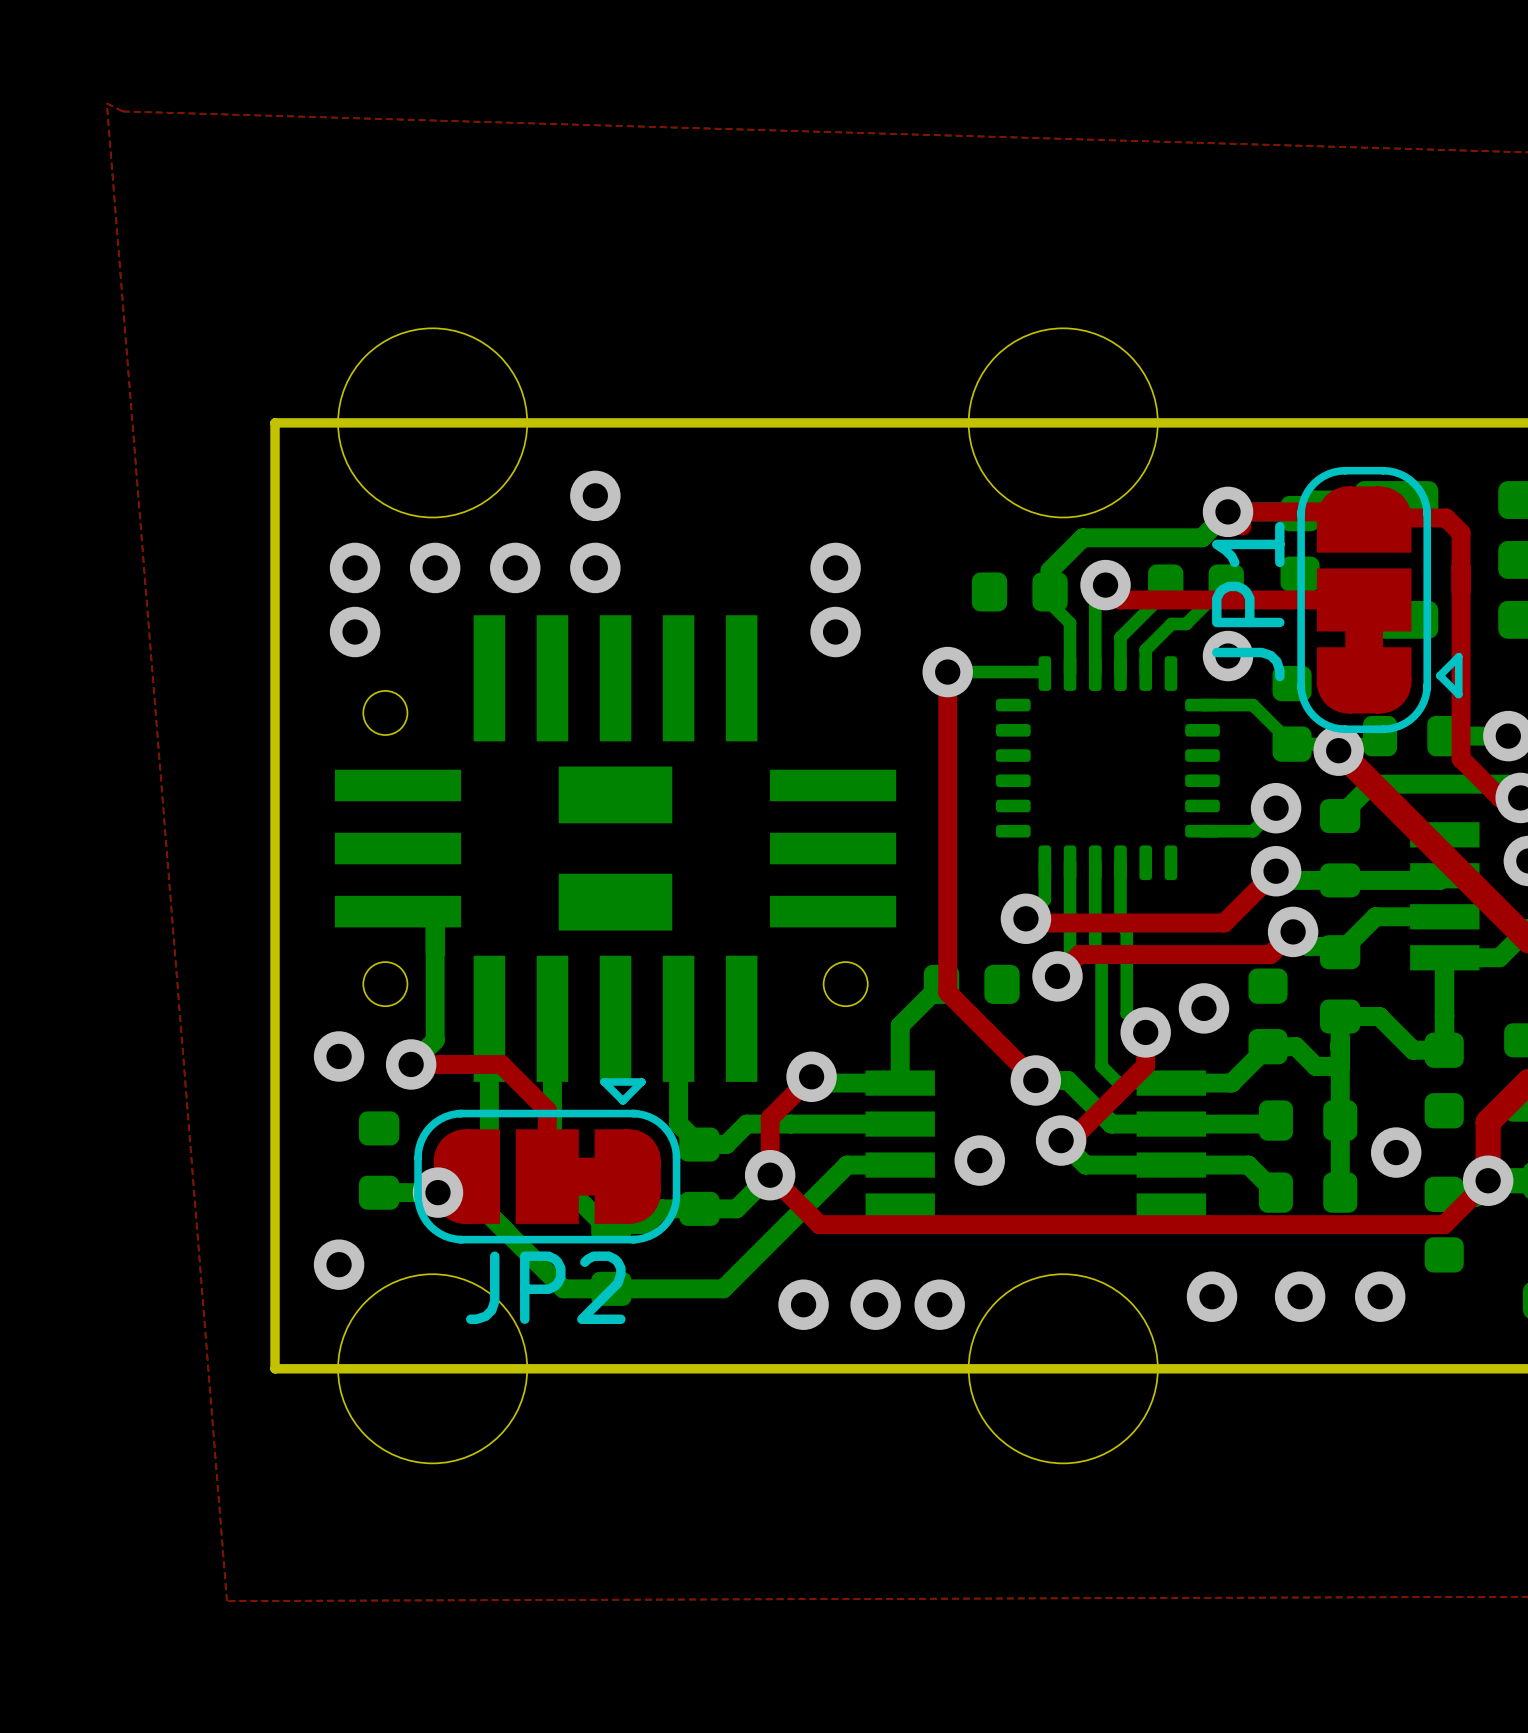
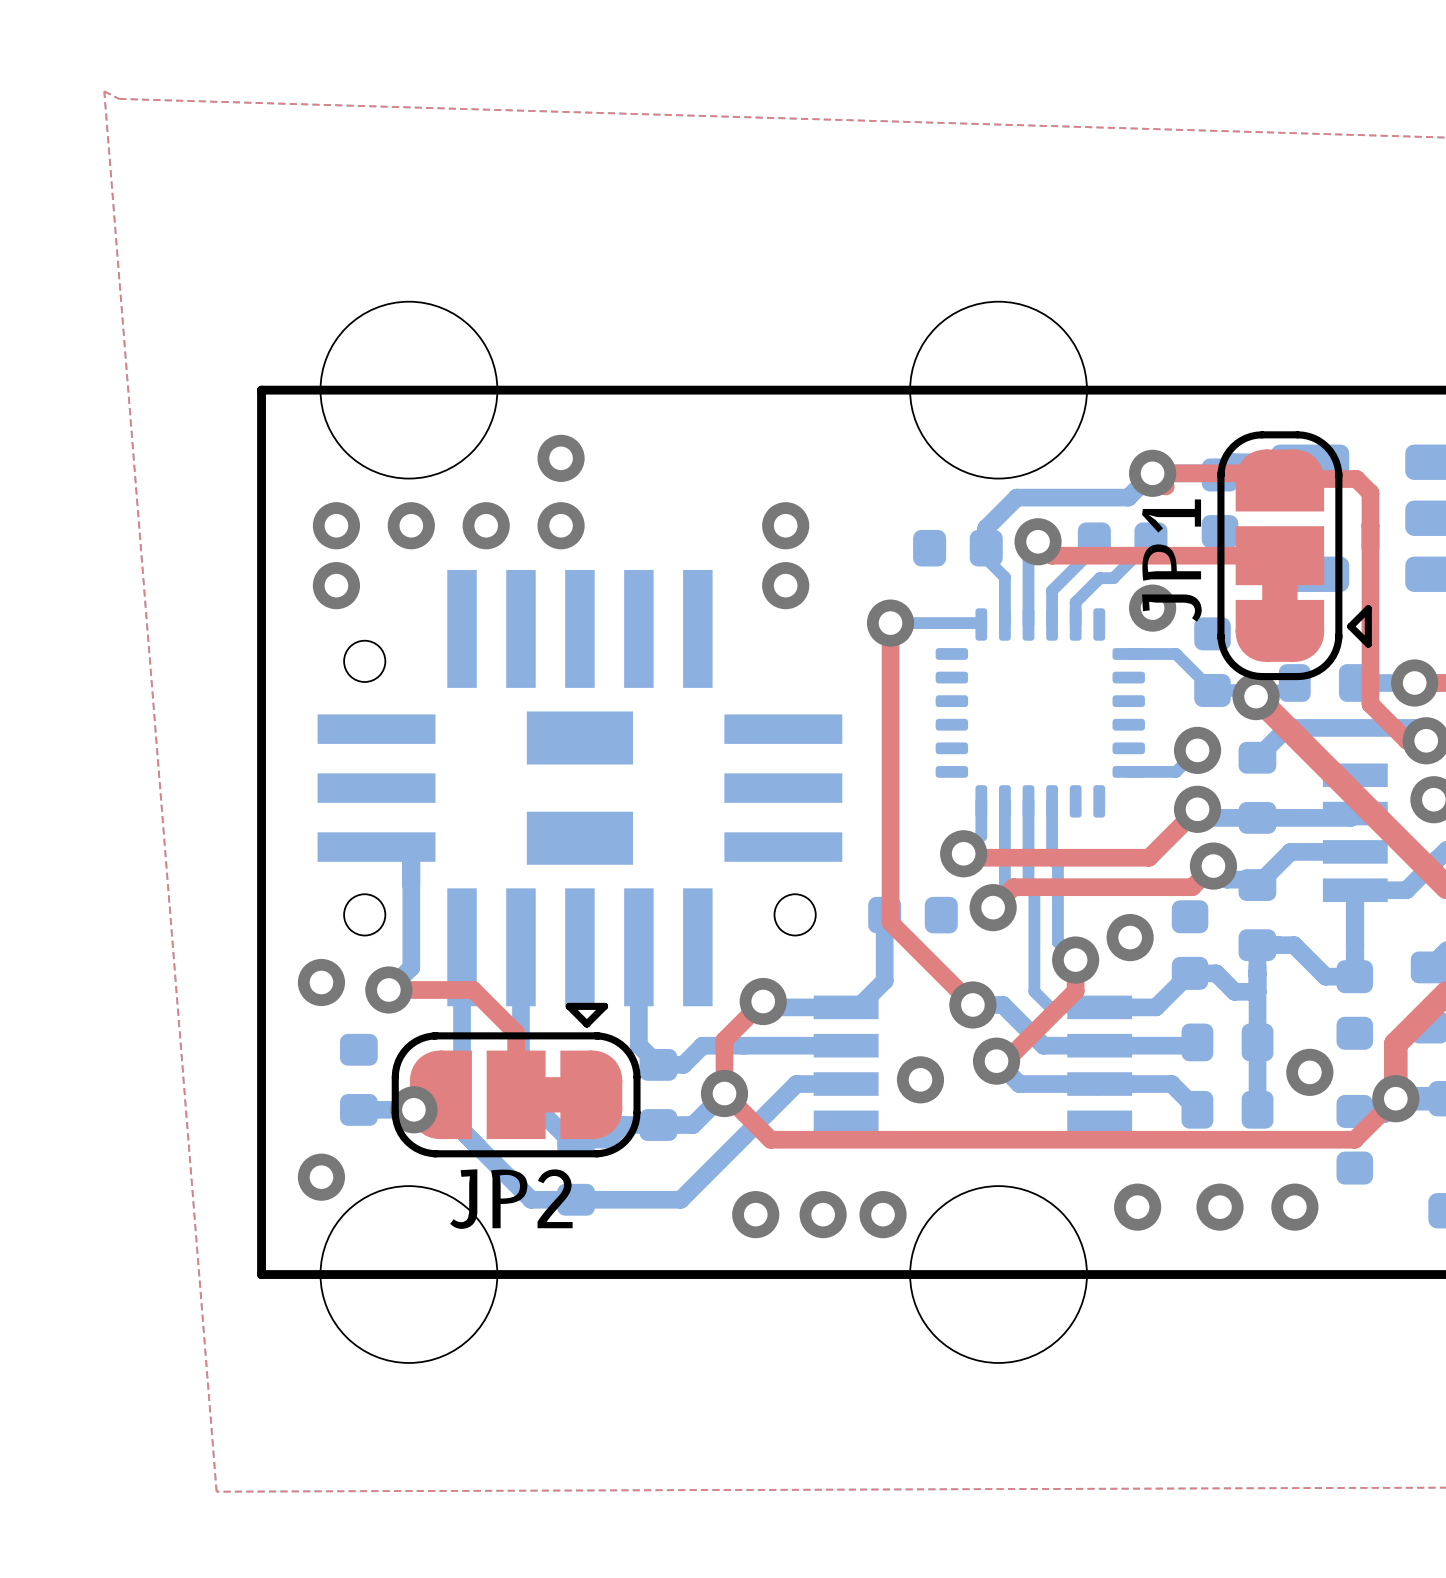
bottom track: (941, 984) (900, 1025) (900, 1083) -> (884, 915) (884, 980) (858, 1007) (846, 1007)

